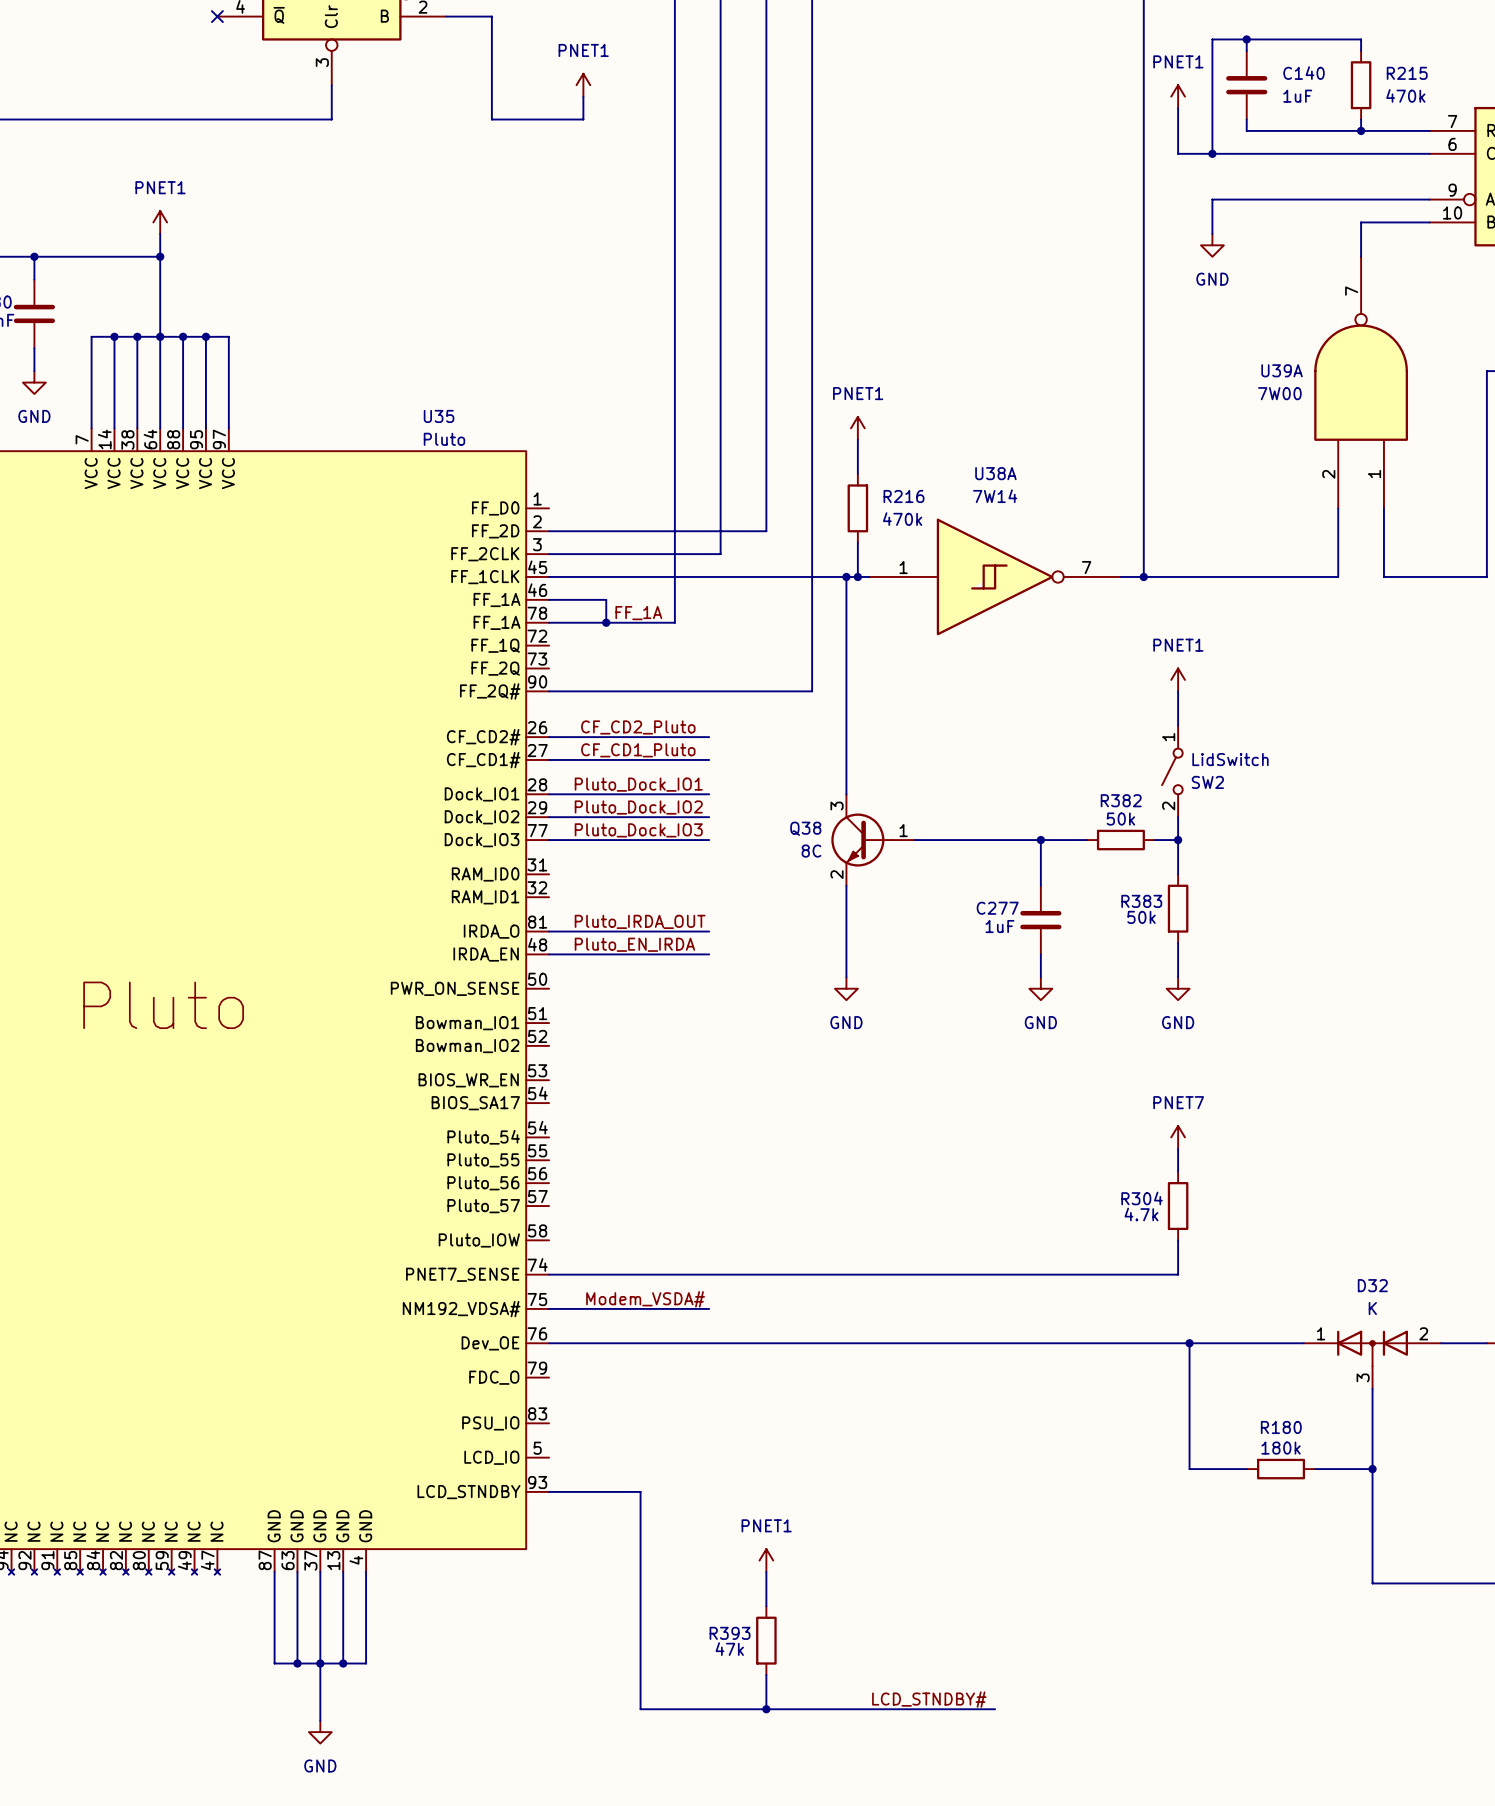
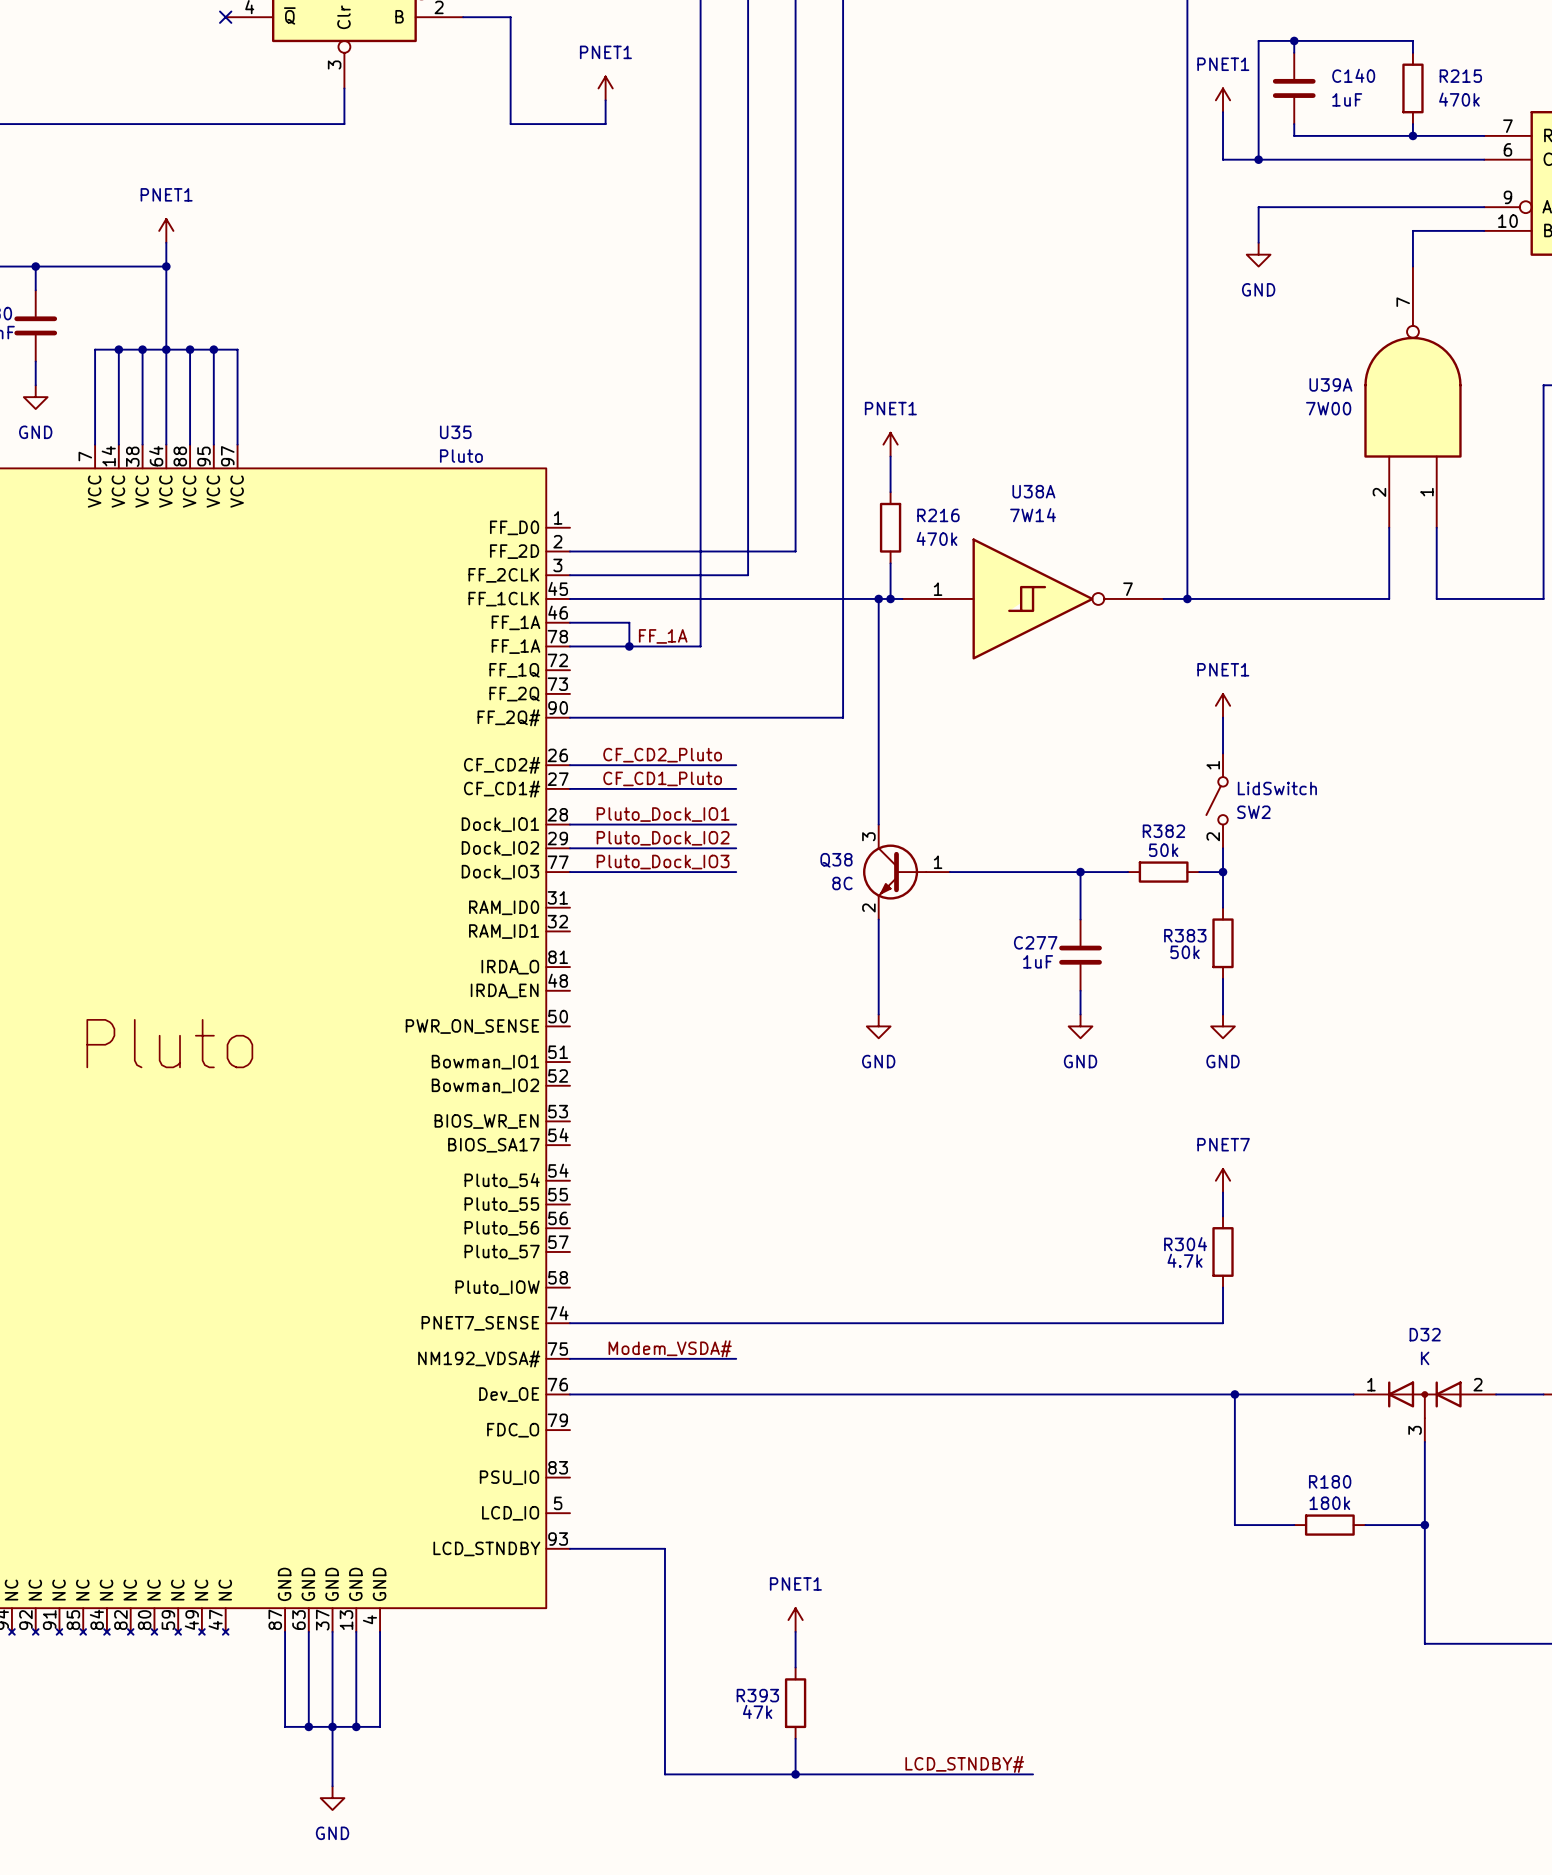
label: Pluto_IRDA_OUT (640, 921) -> none
wire: (549, 931) (709, 931) -> none
label: Pluto_EN_IRDA (634, 944) -> none
wire: (549, 954) (709, 954) -> none

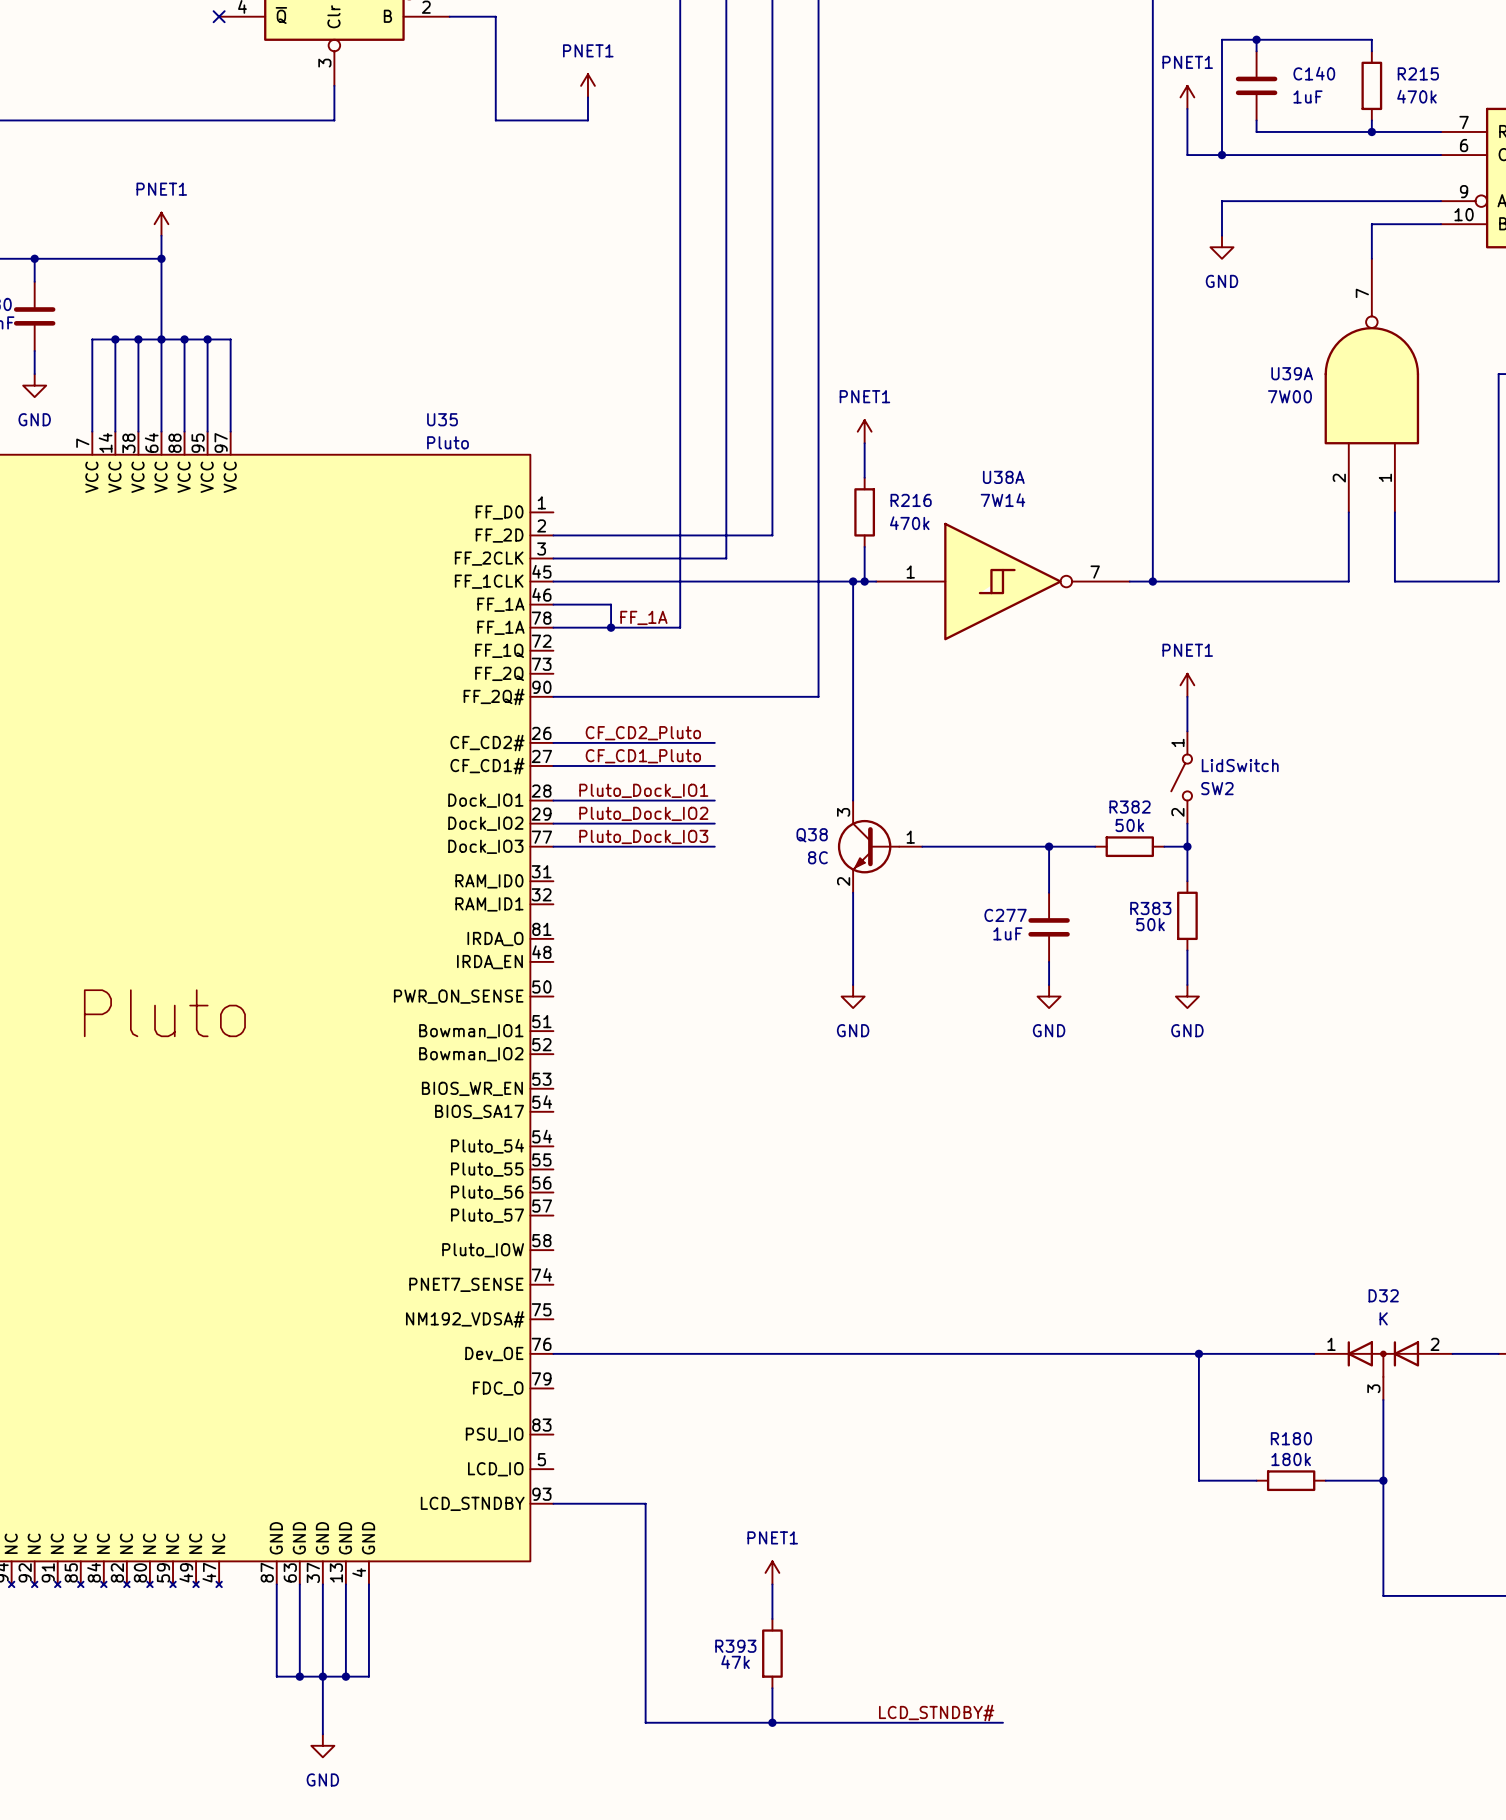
power symbol: PNET7 (1223, 1180) -> none
wire: (1223, 1192) (1223, 1216) -> none
R304: 4.7k (1223, 1251) -> none
wire: (1223, 1287) (1223, 1323) (570, 1323) -> none
label: Modem_VSDA# (670, 1348) -> none
wire: (570, 1358) (736, 1358) -> none

